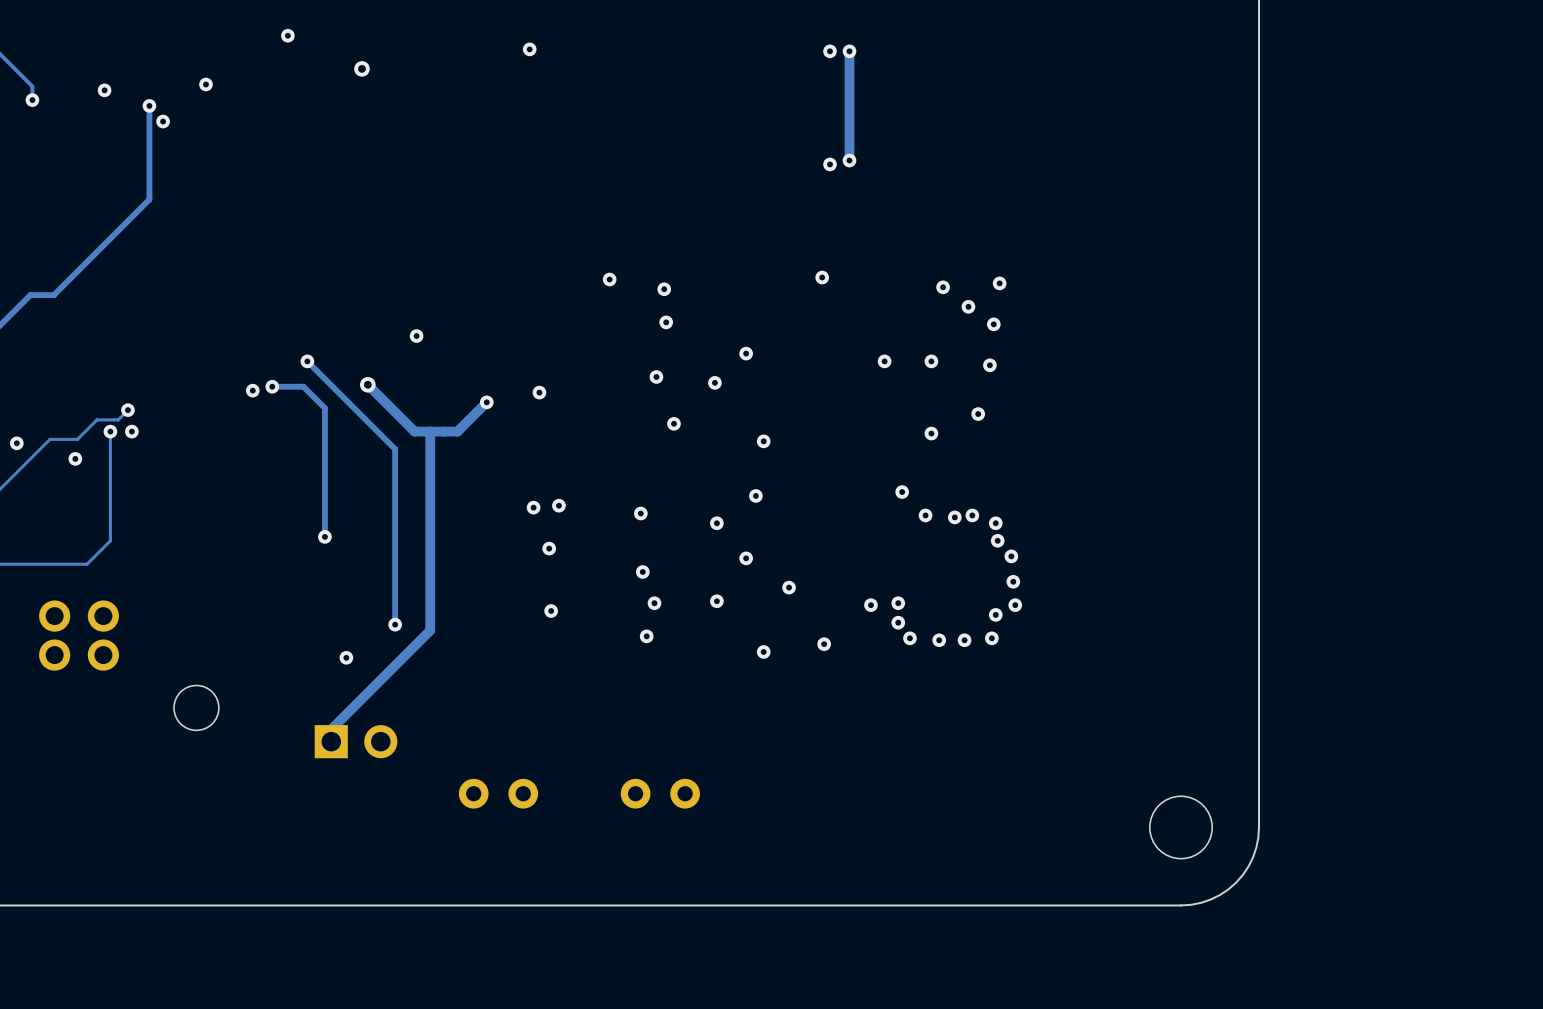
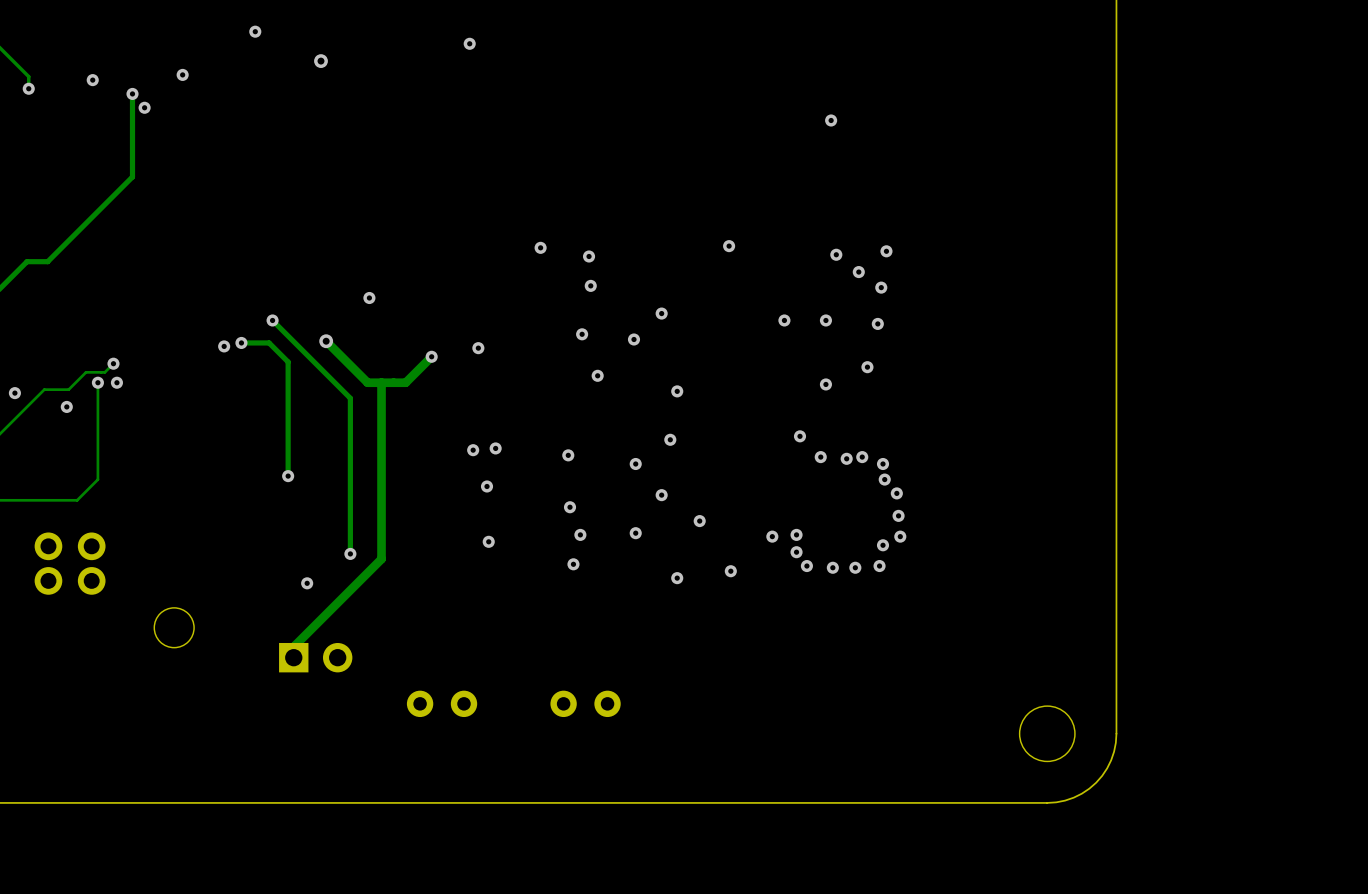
via: (830, 51) -> none
track: (849, 51) (849, 160) -> none
via: (849, 51) -> none
via: none -> (831, 120)
via: (849, 160) -> none
via: (830, 164) -> none

